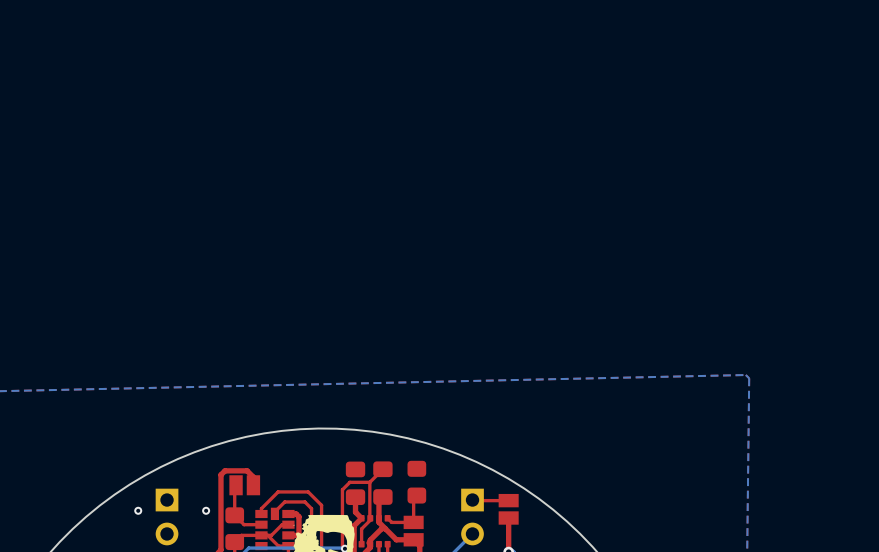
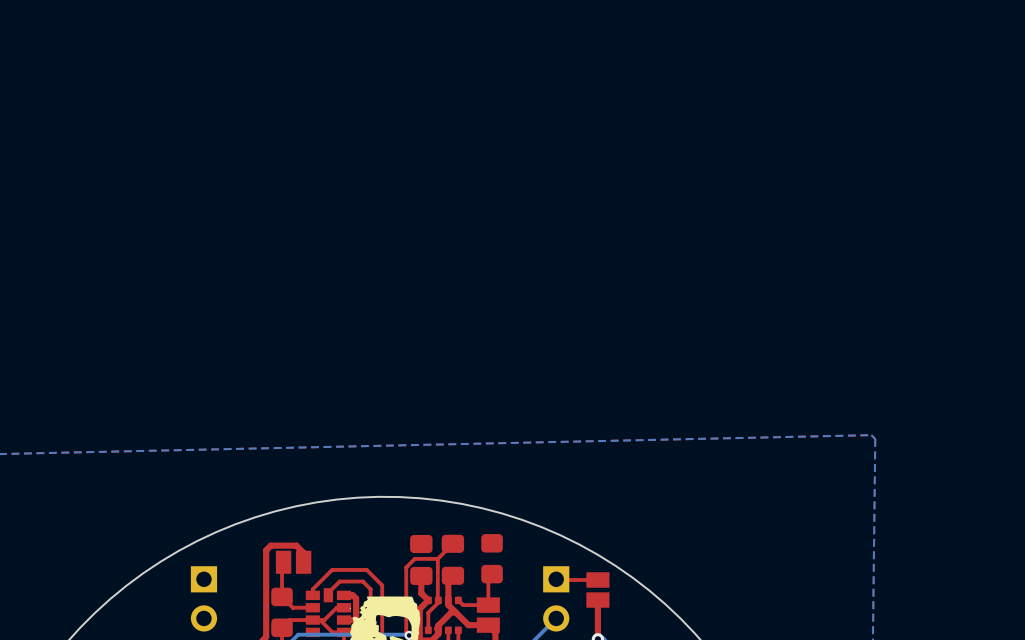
via: (138, 510) -> none
via: (206, 510) -> none

